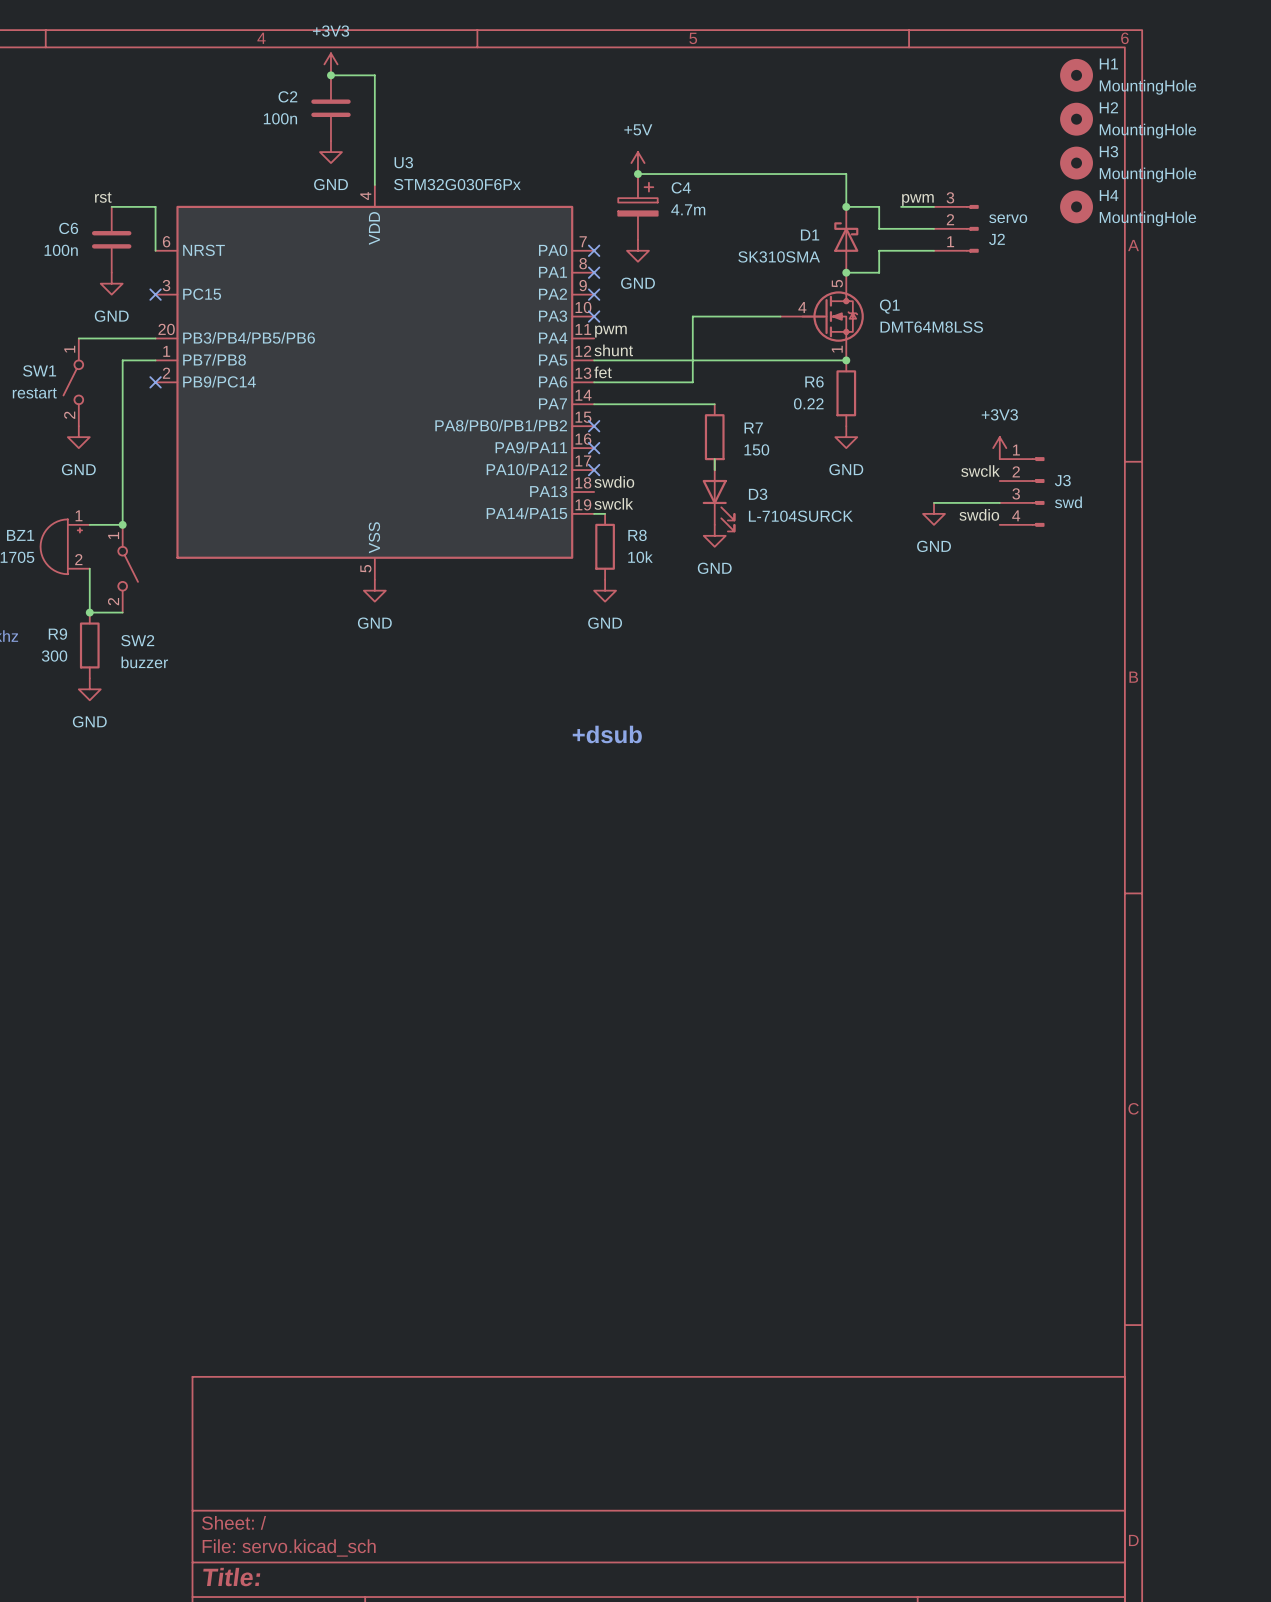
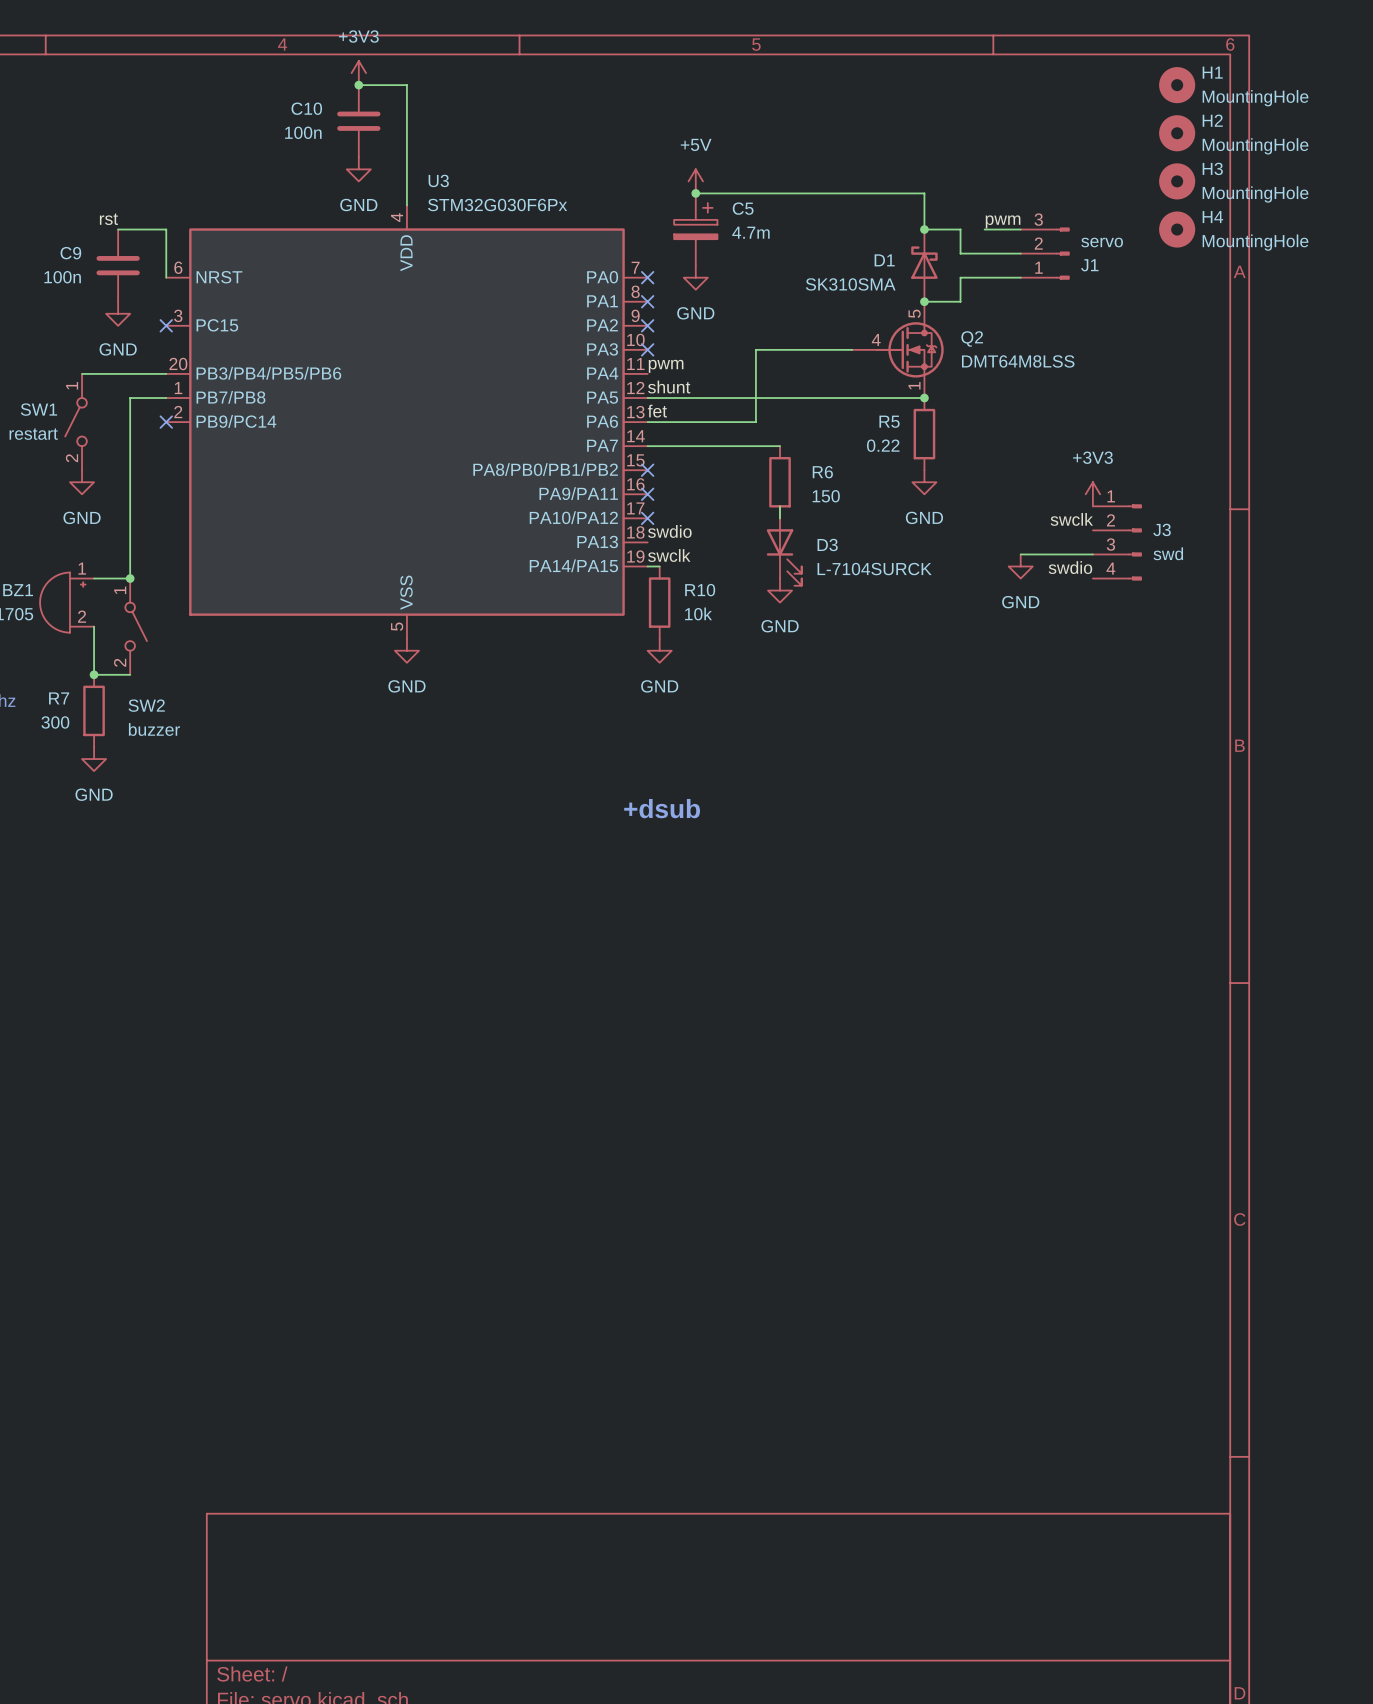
C2 name: C2 (287, 96) -> C10 (306, 108)
C4 name: C4 (681, 187) -> C5 (743, 208)
C6 name: C6 (68, 228) -> C9 (70, 253)
J2 name: J2 (996, 239) -> J1 (1089, 265)
Q1 name: Q1 (889, 306) -> Q2 (972, 338)
R6 name: R6 (814, 381) -> R5 (889, 421)
R7 name: R7 (753, 427) -> R6 (822, 472)
R8 name: R8 (637, 535) -> R10 (700, 590)
R9 name: R9 (57, 634) -> R7 (59, 698)

